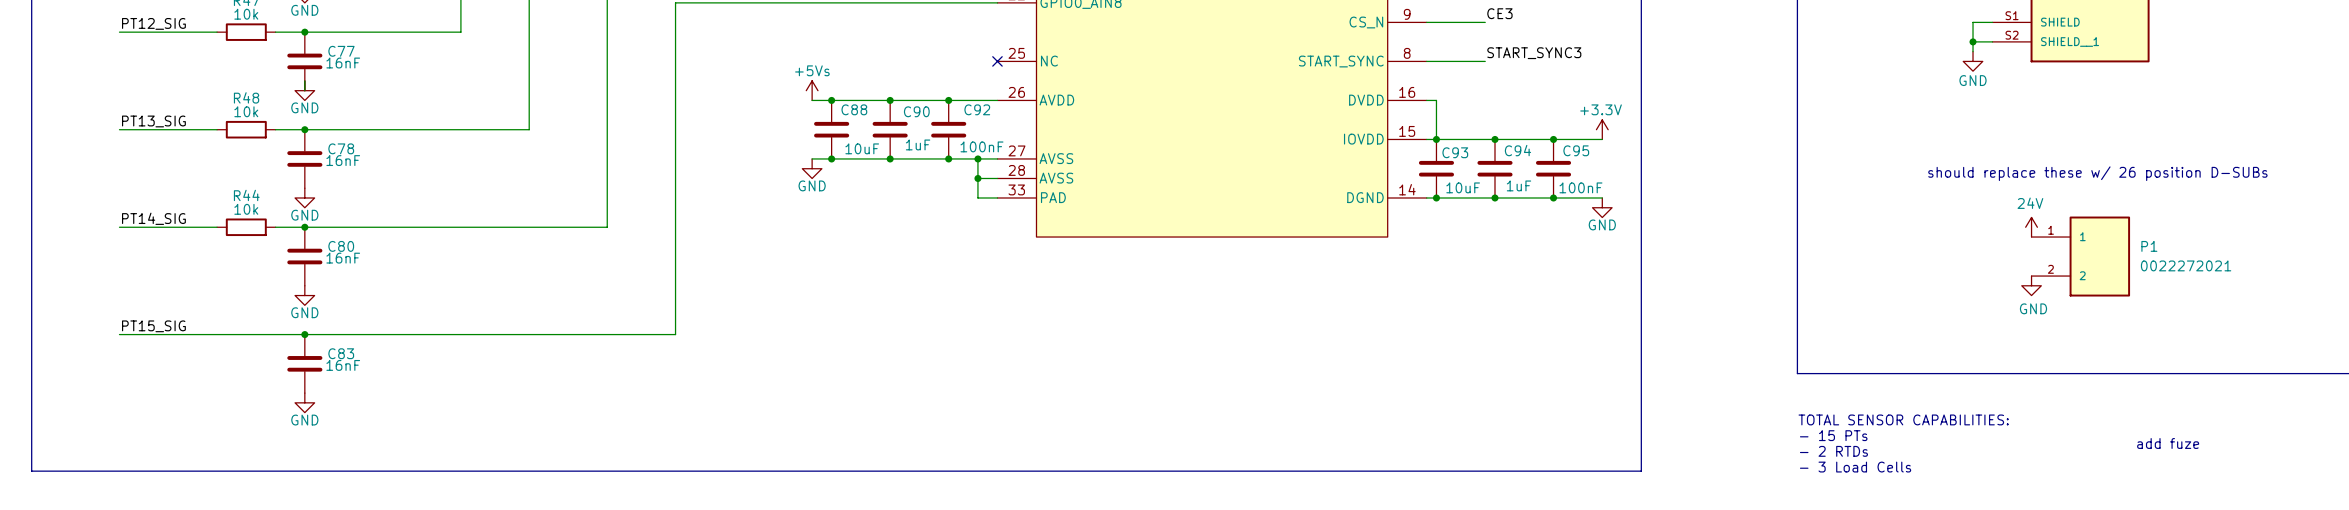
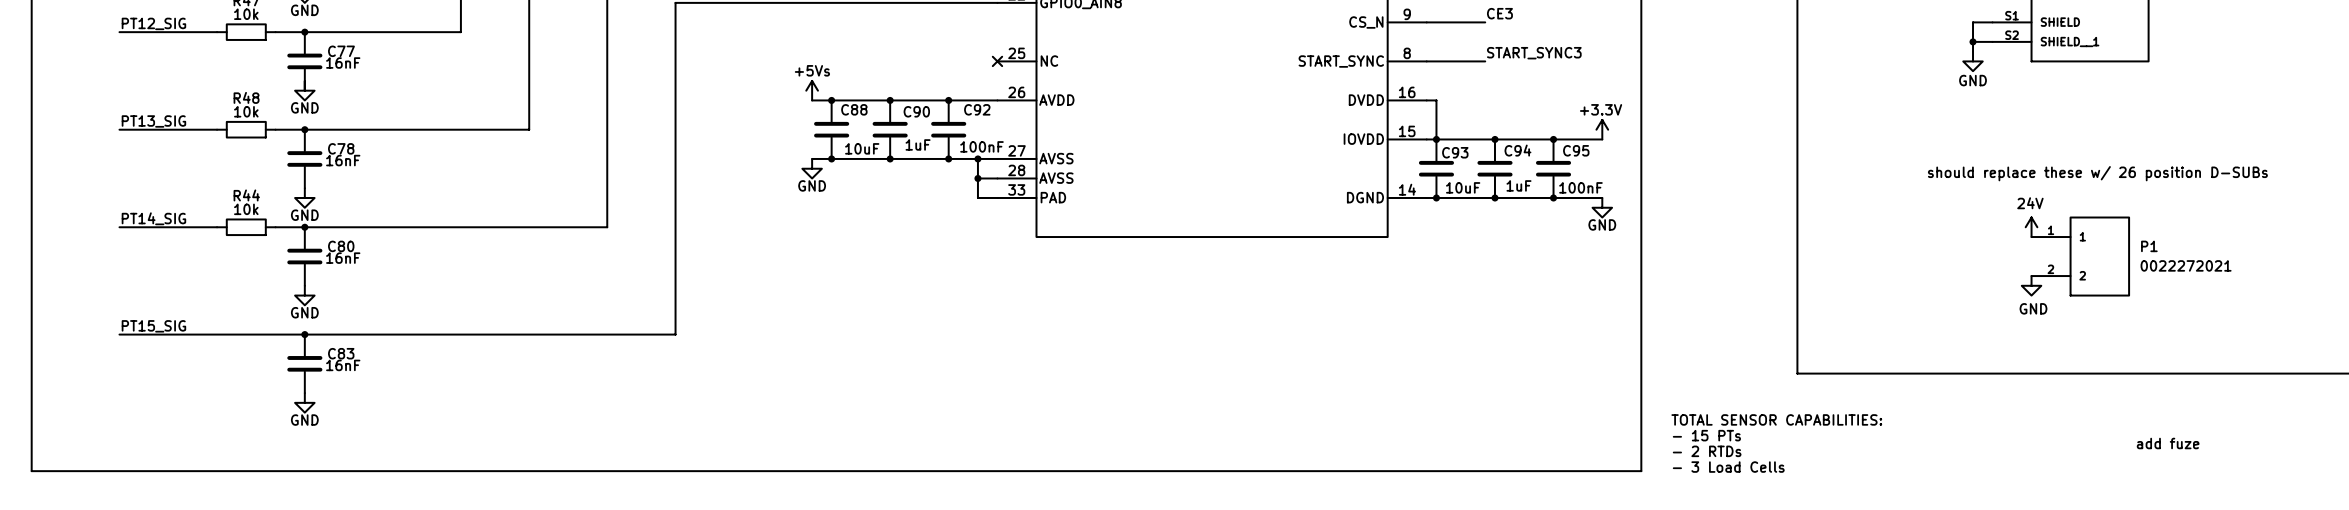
text position: TOTAL SENSOR CAPABILITIES: (1903, 419) -> TOTAL SENSOR CAPABILITIES: (1776, 419)
text position: - 15 PTs (1833, 435) -> - 15 PTs (1706, 435)
text position: - 2 RTDs (1833, 451) -> - 2 RTDs (1707, 451)
text position: - 3 Load Cells (1855, 467) -> - 3 Load Cells (1728, 467)

